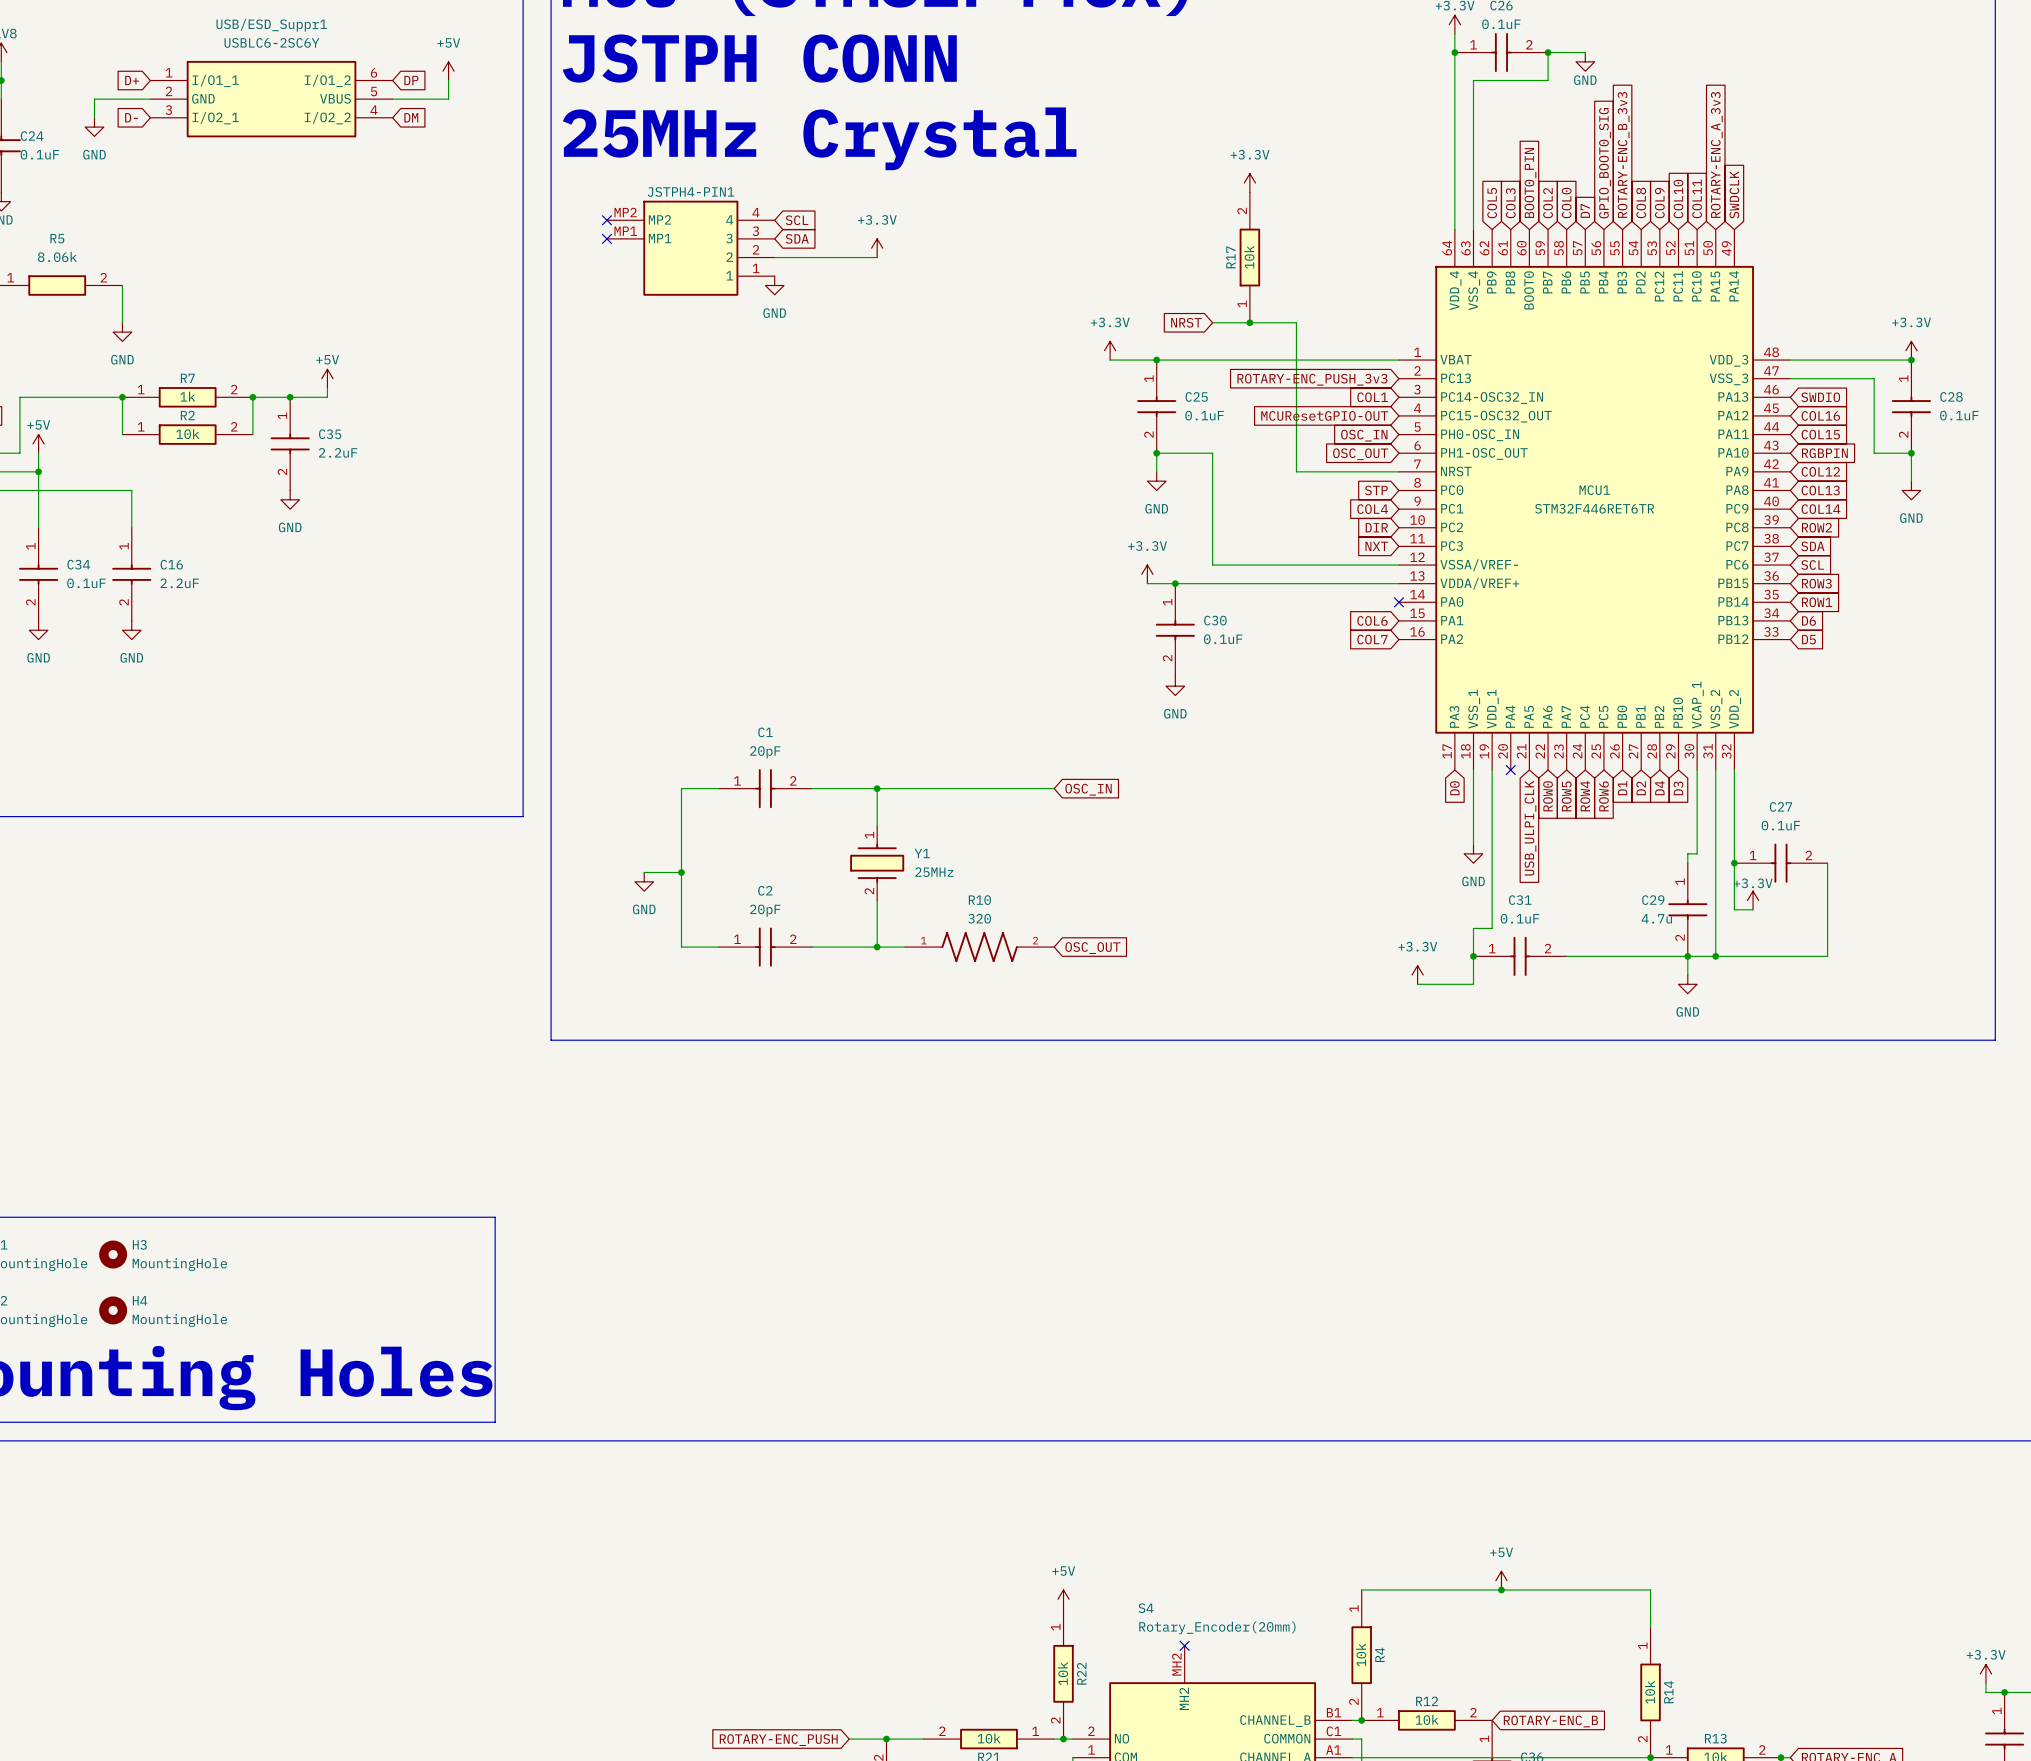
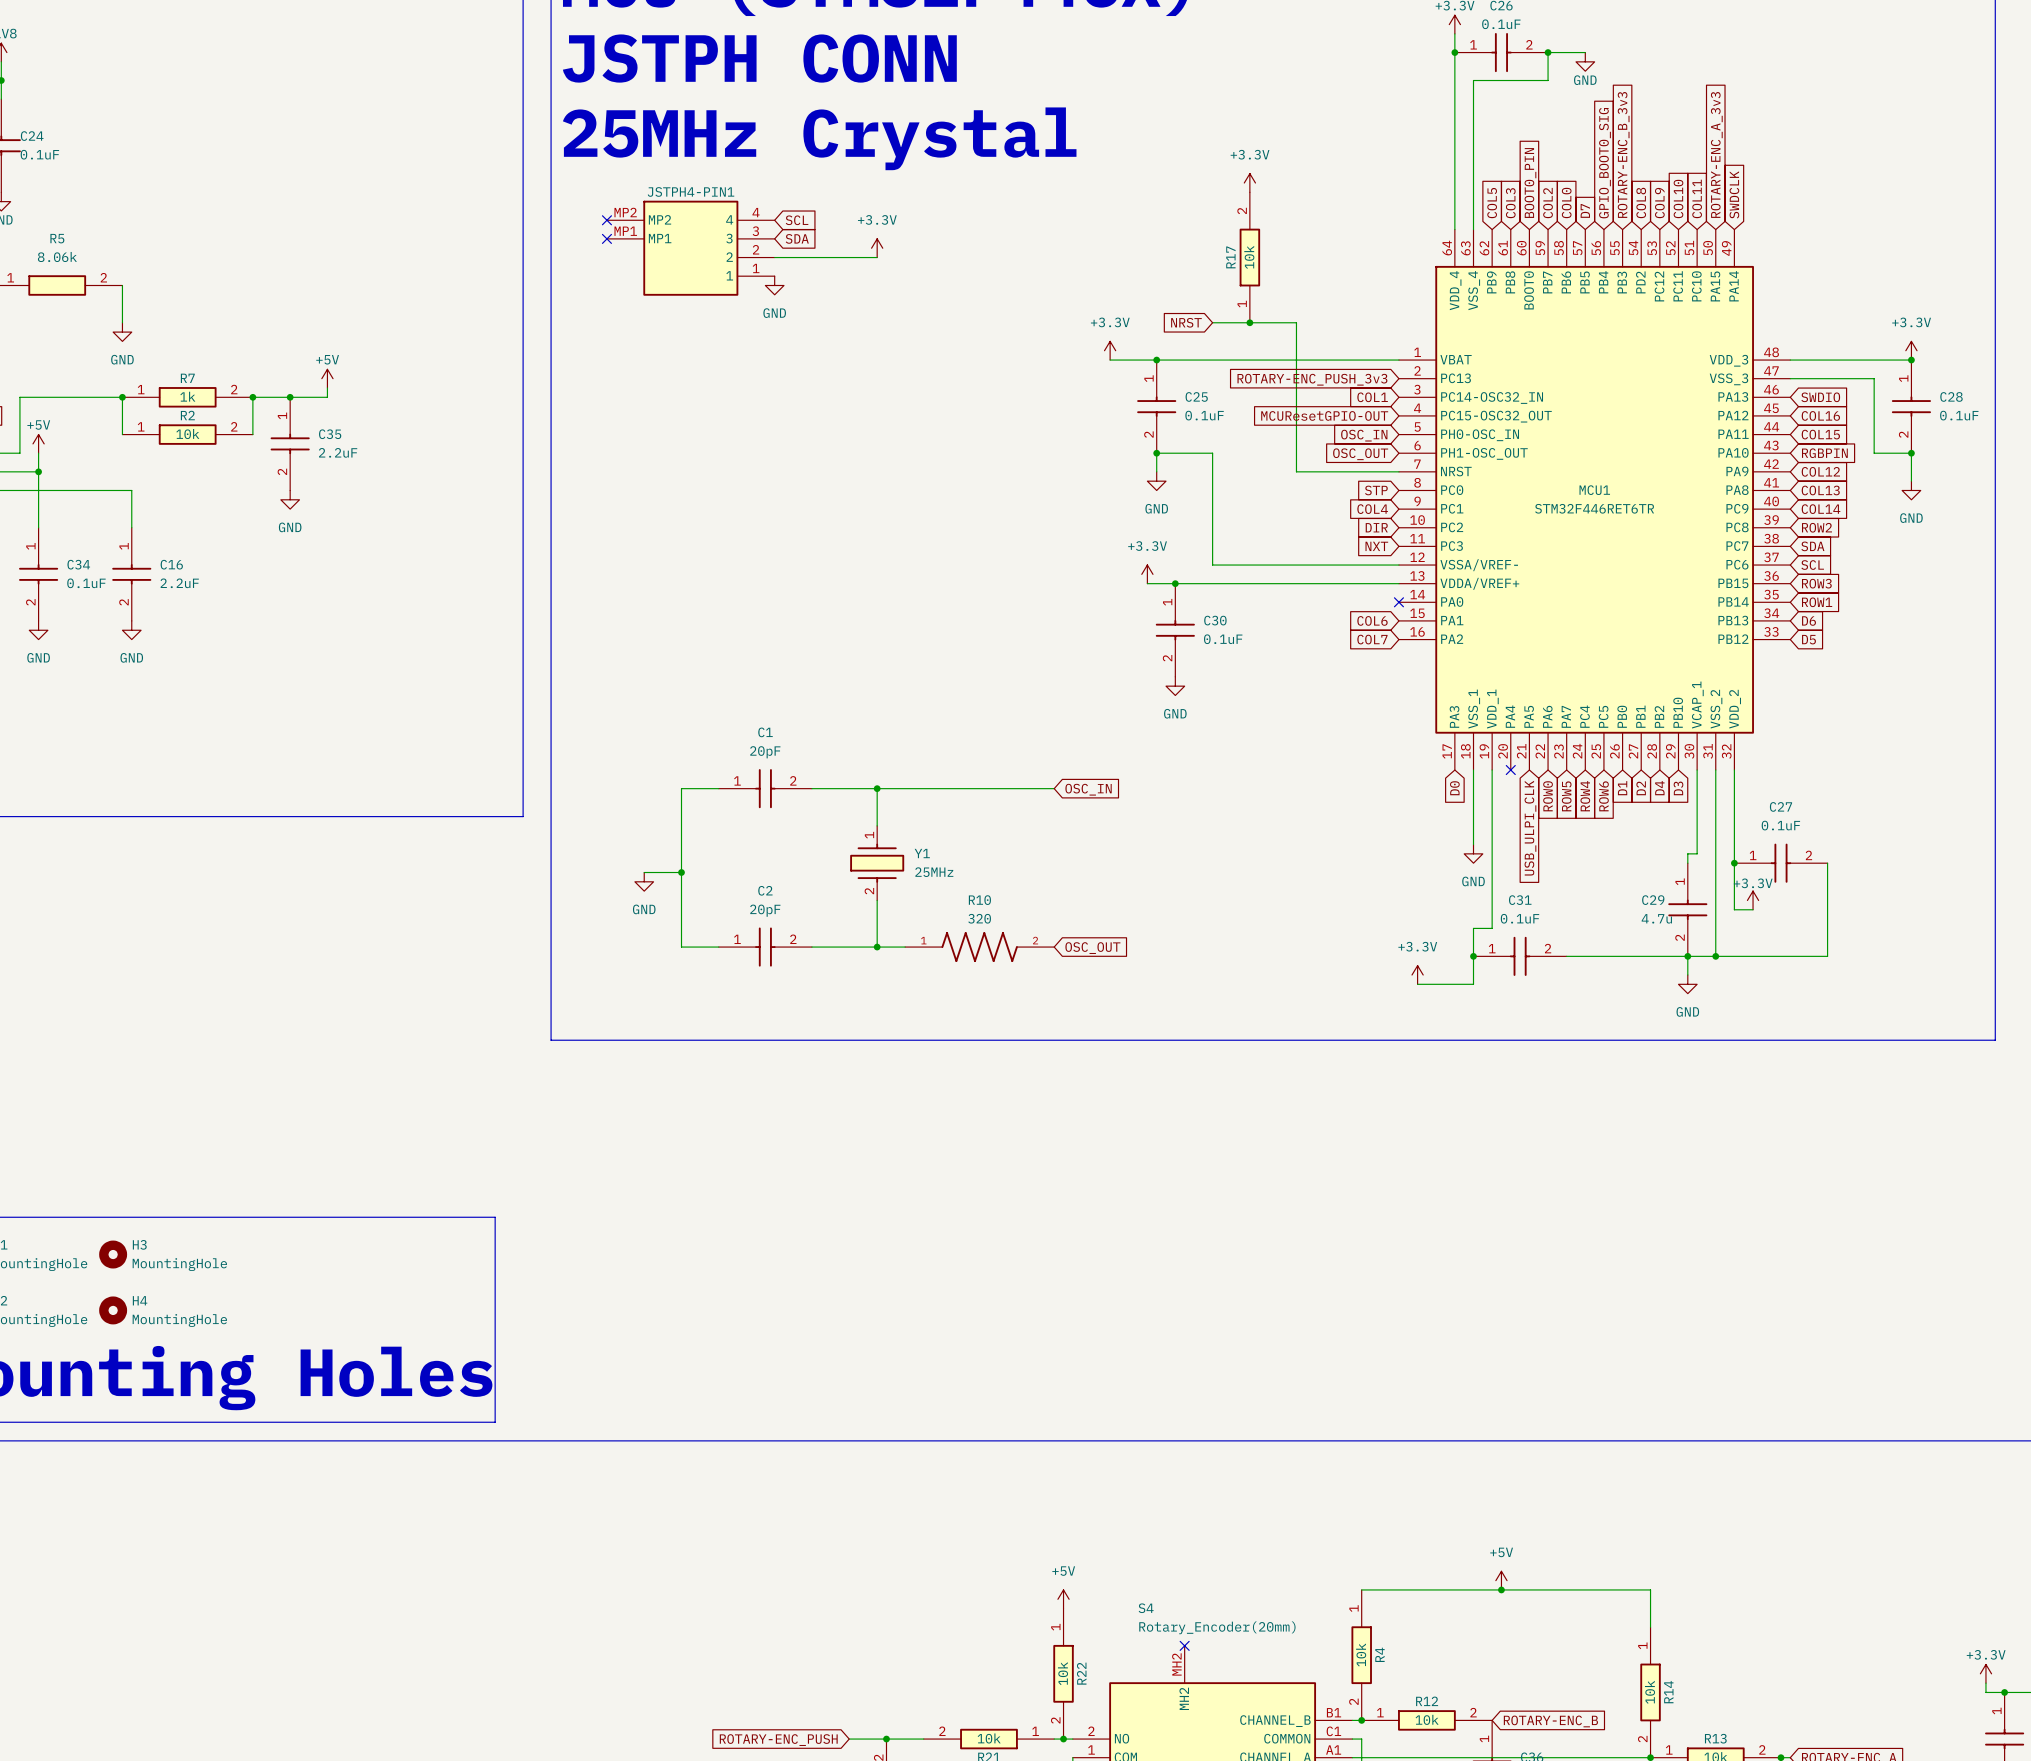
power symbol: +5V (448, 71) -> none
global label: D+ (132, 80) -> none
global label: DP (411, 80) -> none
wire: (448, 80) (448, 99) (392, 99) -> none
wire: (150, 99) (94, 99) (94, 117) -> none
USB/ESD_Suppr1: USBLC6-2SC6Y (271, 99) -> none
global label: D- (131, 117) -> none
global label: DM (411, 117) -> none
power symbol: GND (94, 127) -> none

